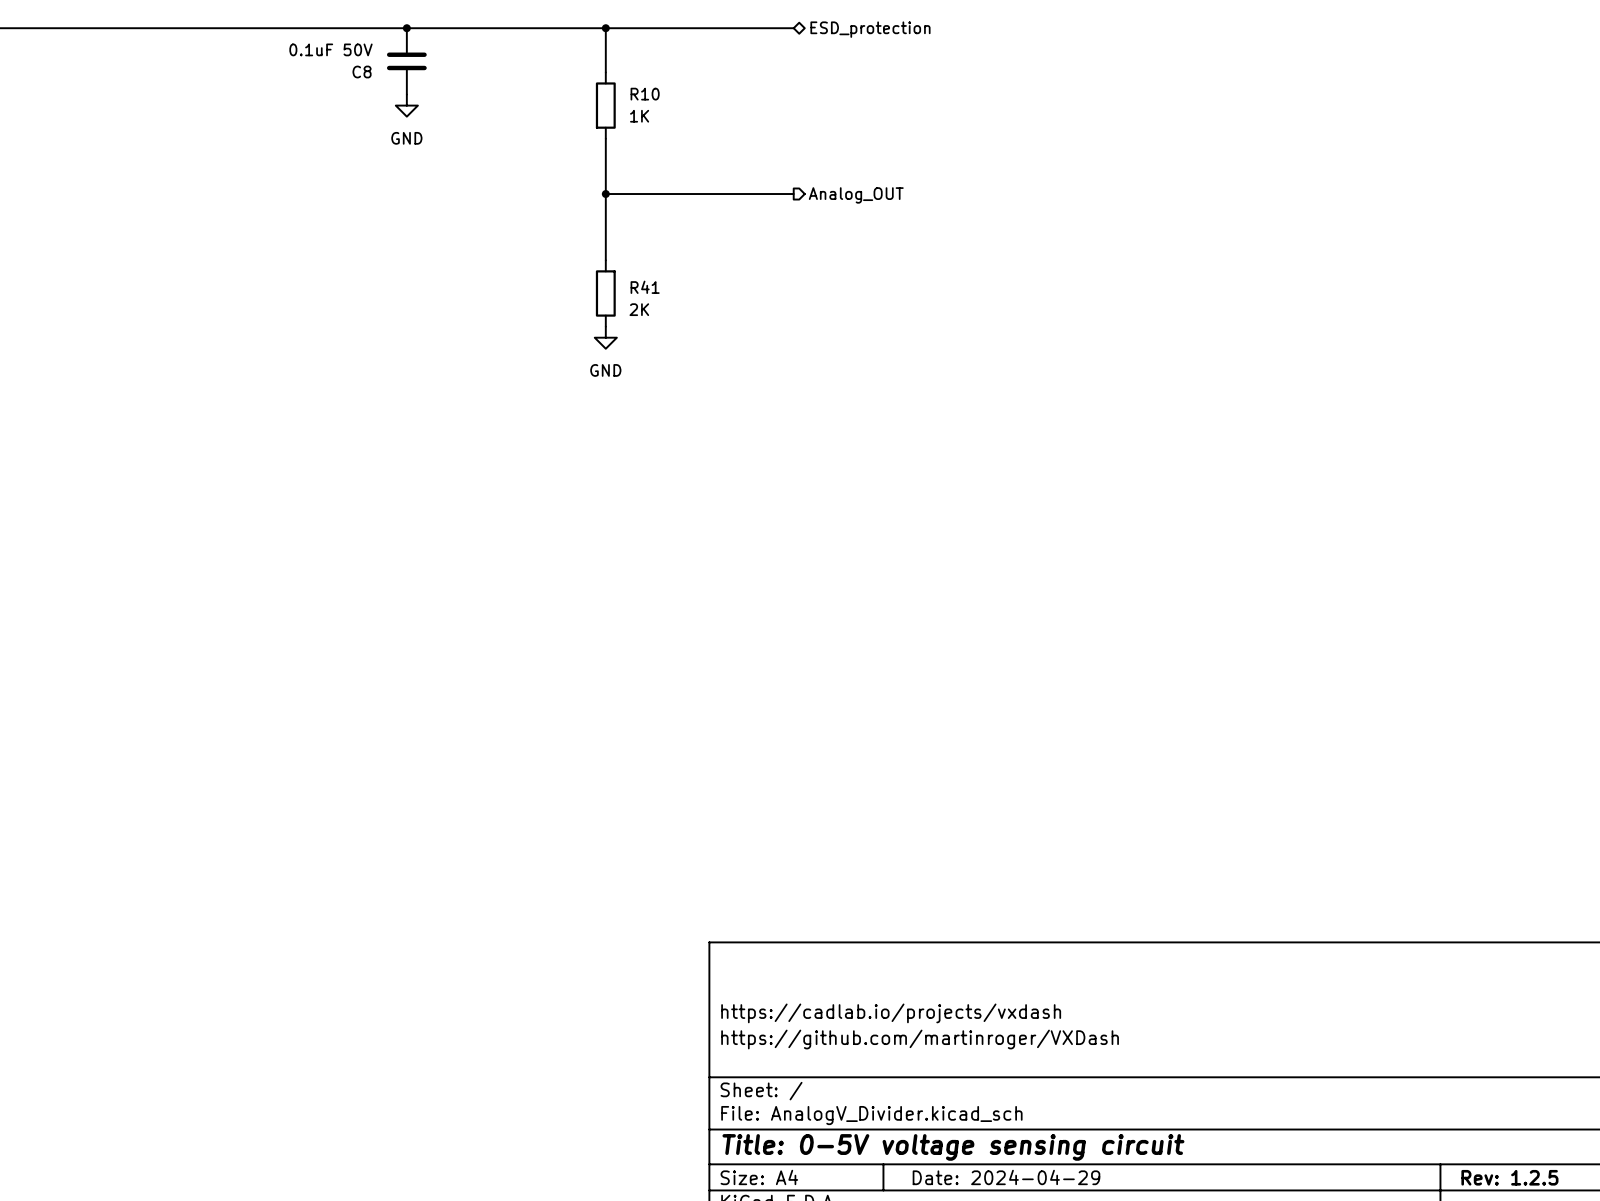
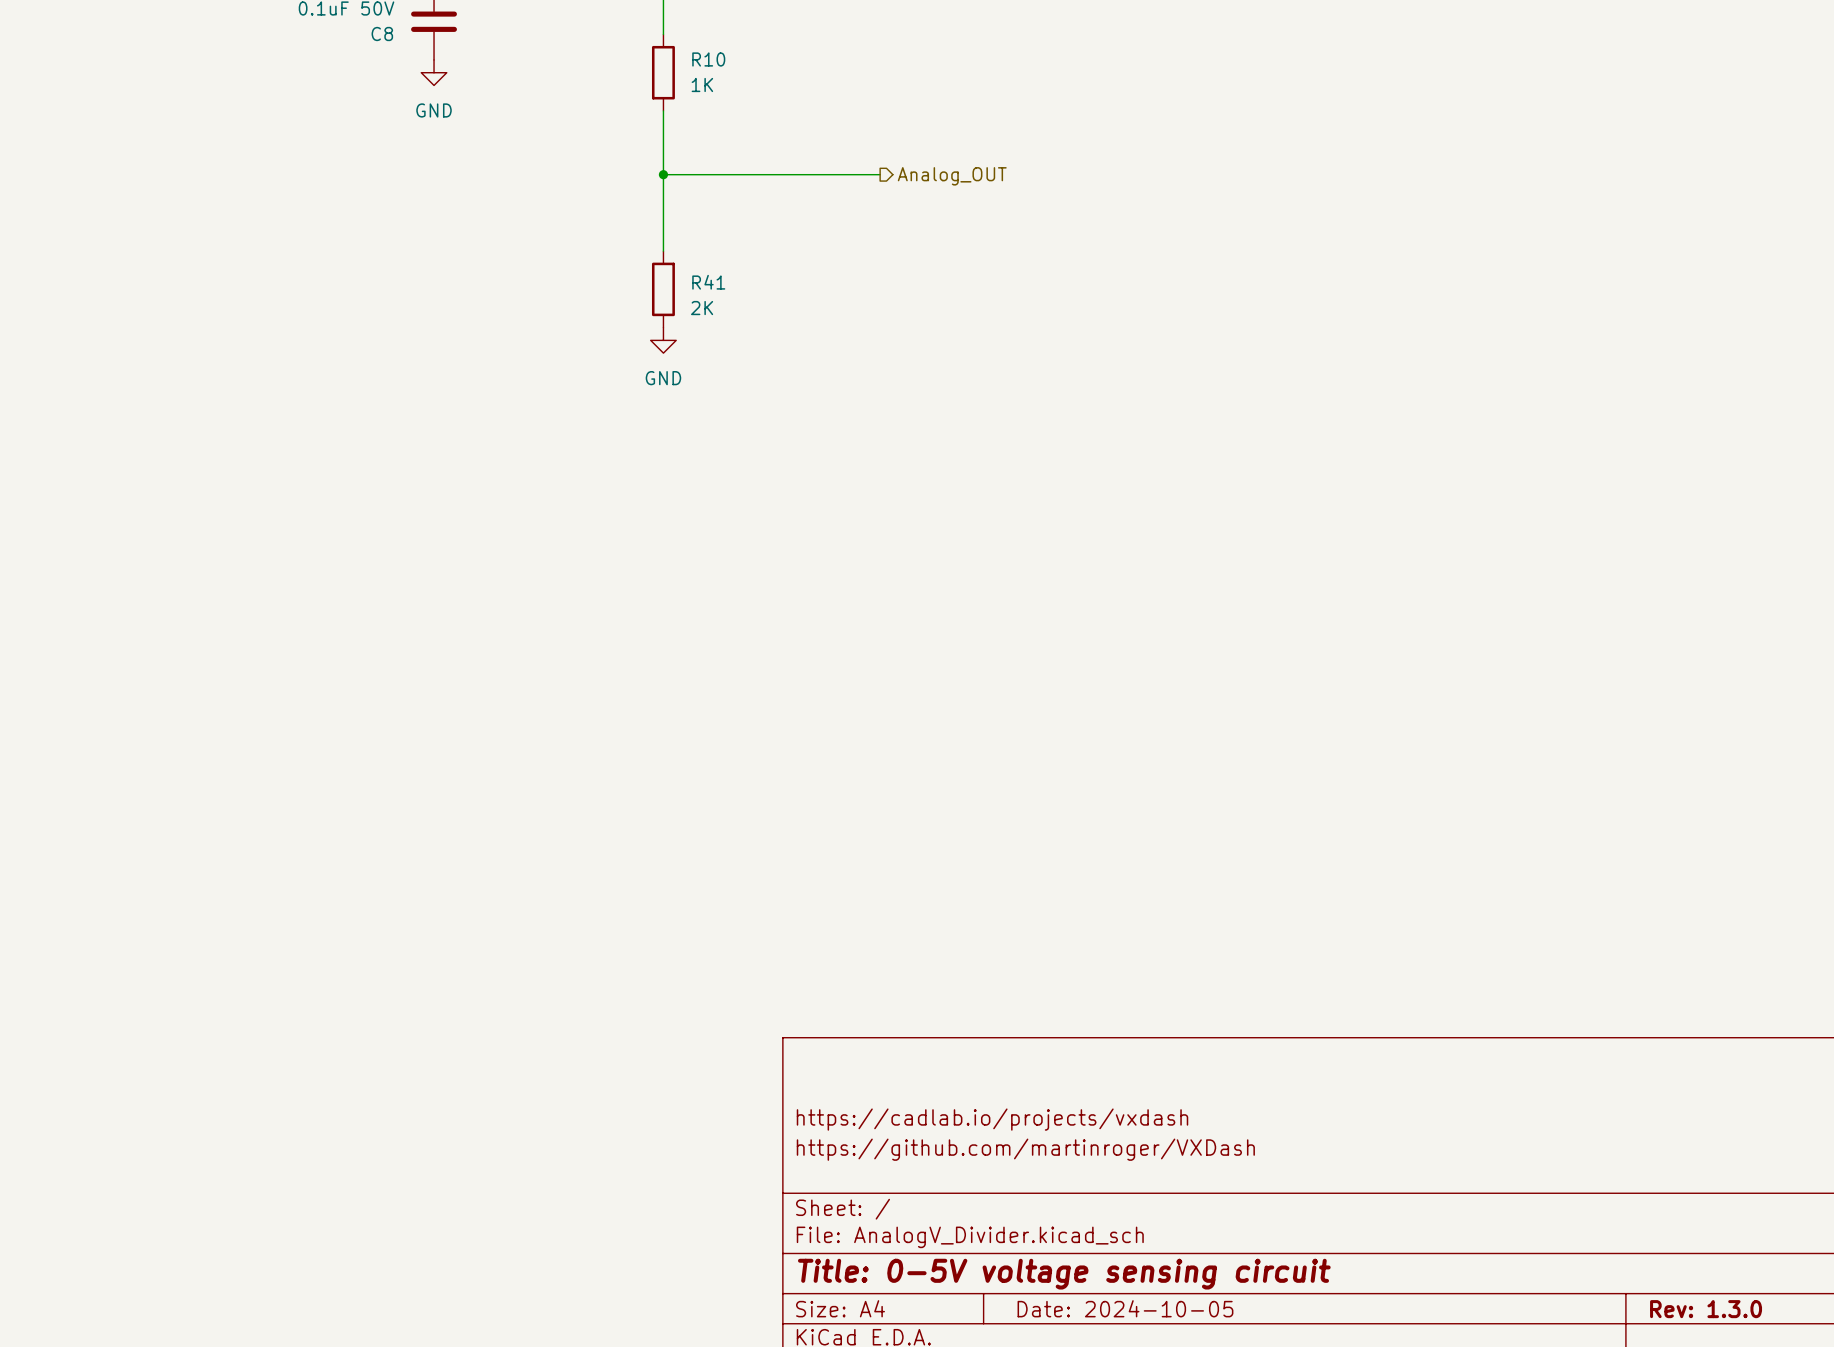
title block: Date: 2024-04-29 (1006, 1177) -> Date: 2024-10-05 (1125, 1308)
title block: Rev: 1.2.5 (1509, 1177) -> Rev: 1.3.0 (1706, 1309)

